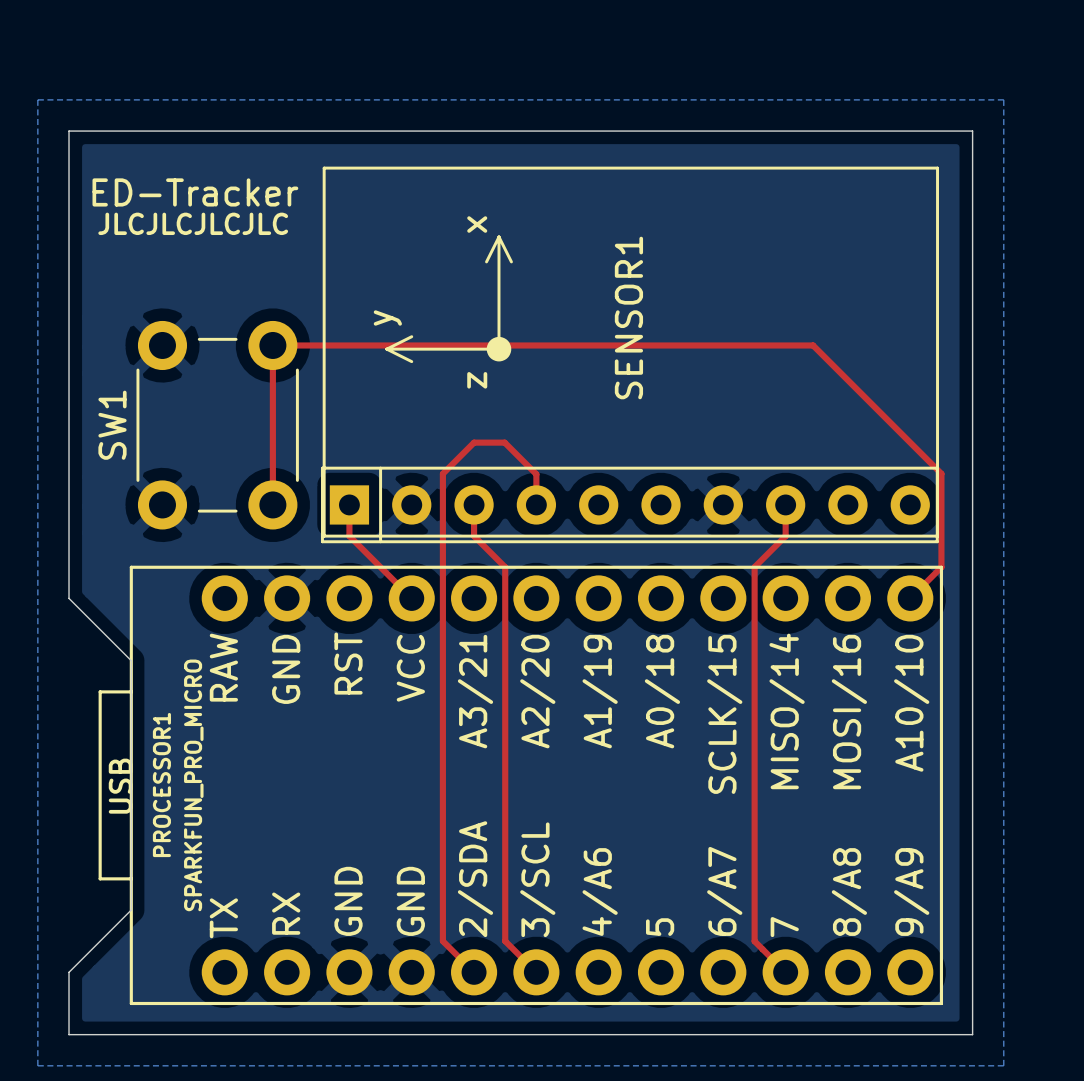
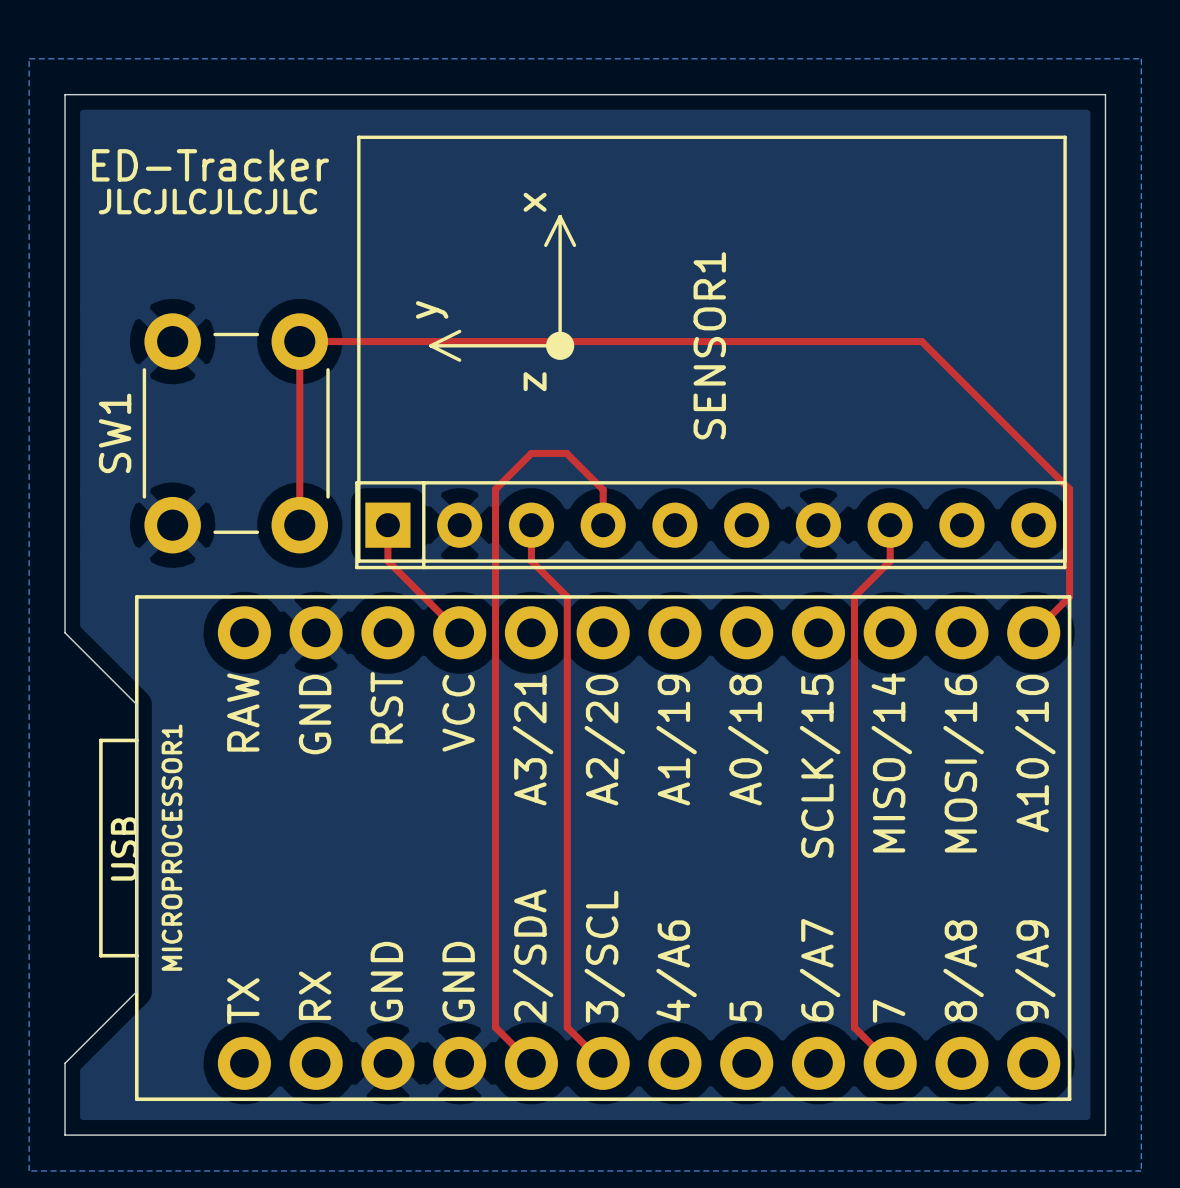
SENSOR1 name position: SENSOR1 (628, 318) -> SENSOR1 (709, 345)
PROCESSOR1 name: PROCESSOR1 (161, 785) -> MICROPROCESSOR1 (172, 847)
PROCESSOR1 value: SPARKFUN_PRO_MICRO (193, 785) -> none

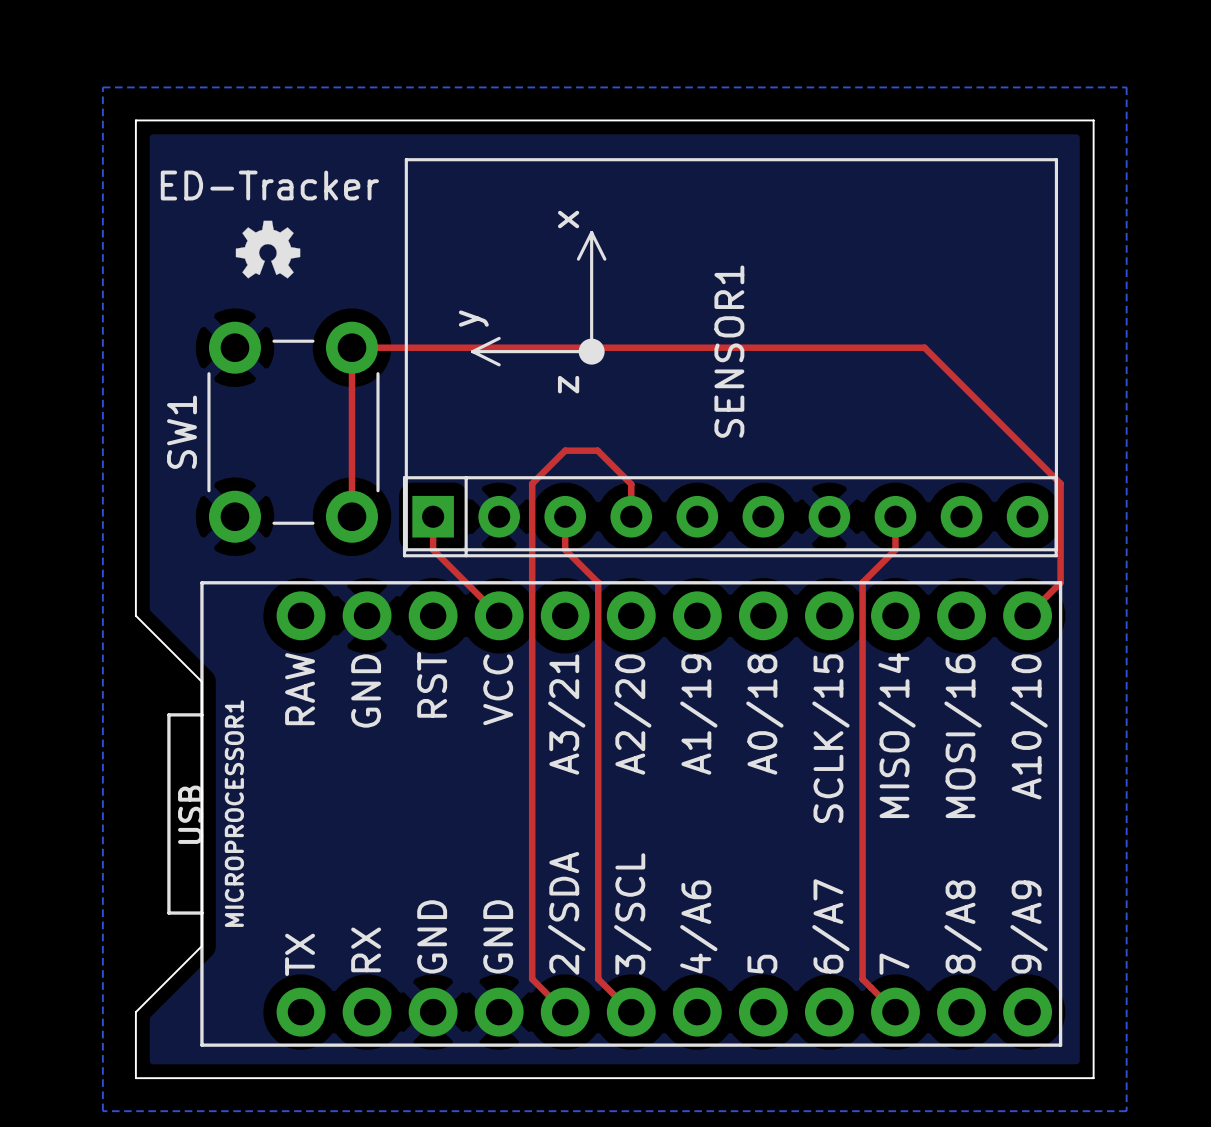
text: JLCJLCJLCJLC (208, 201) -> none
drawing: none -> [235, 220, 301, 279]

